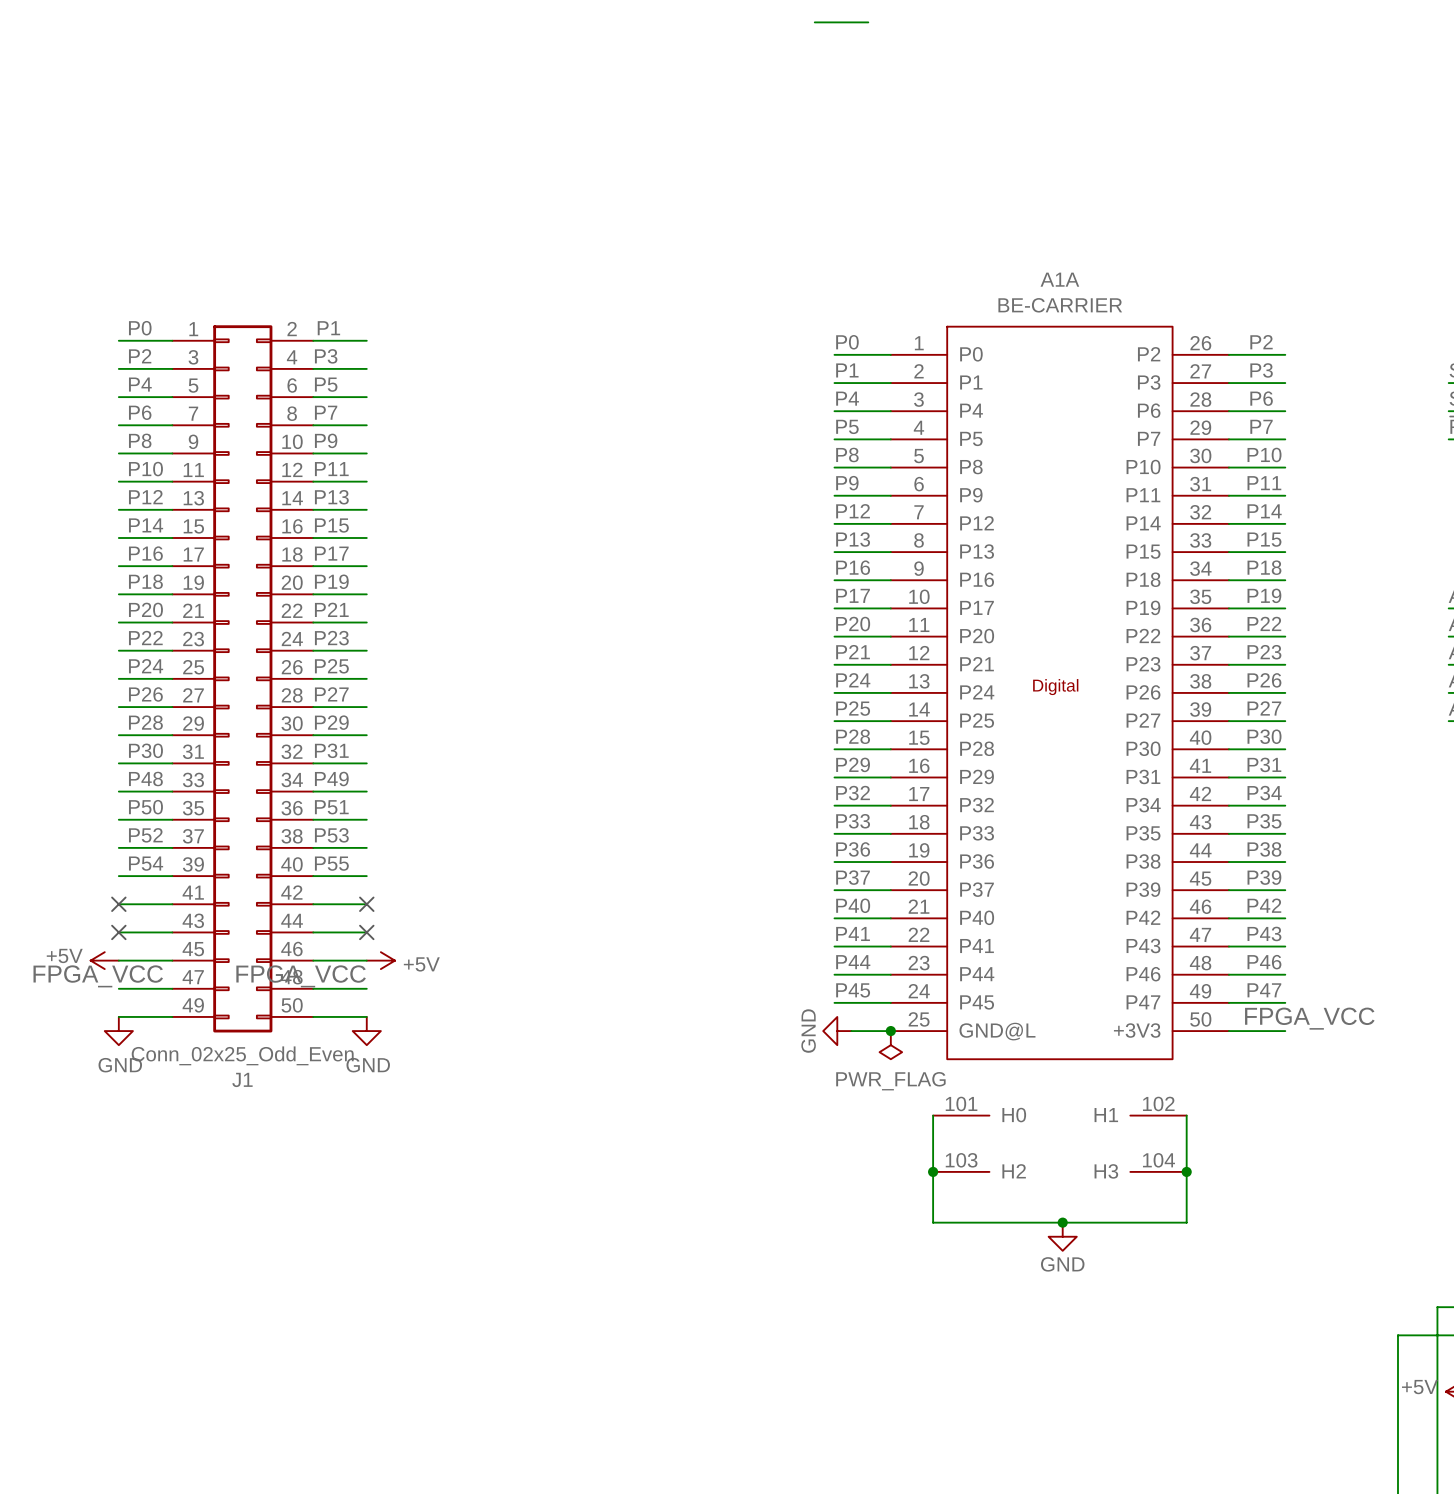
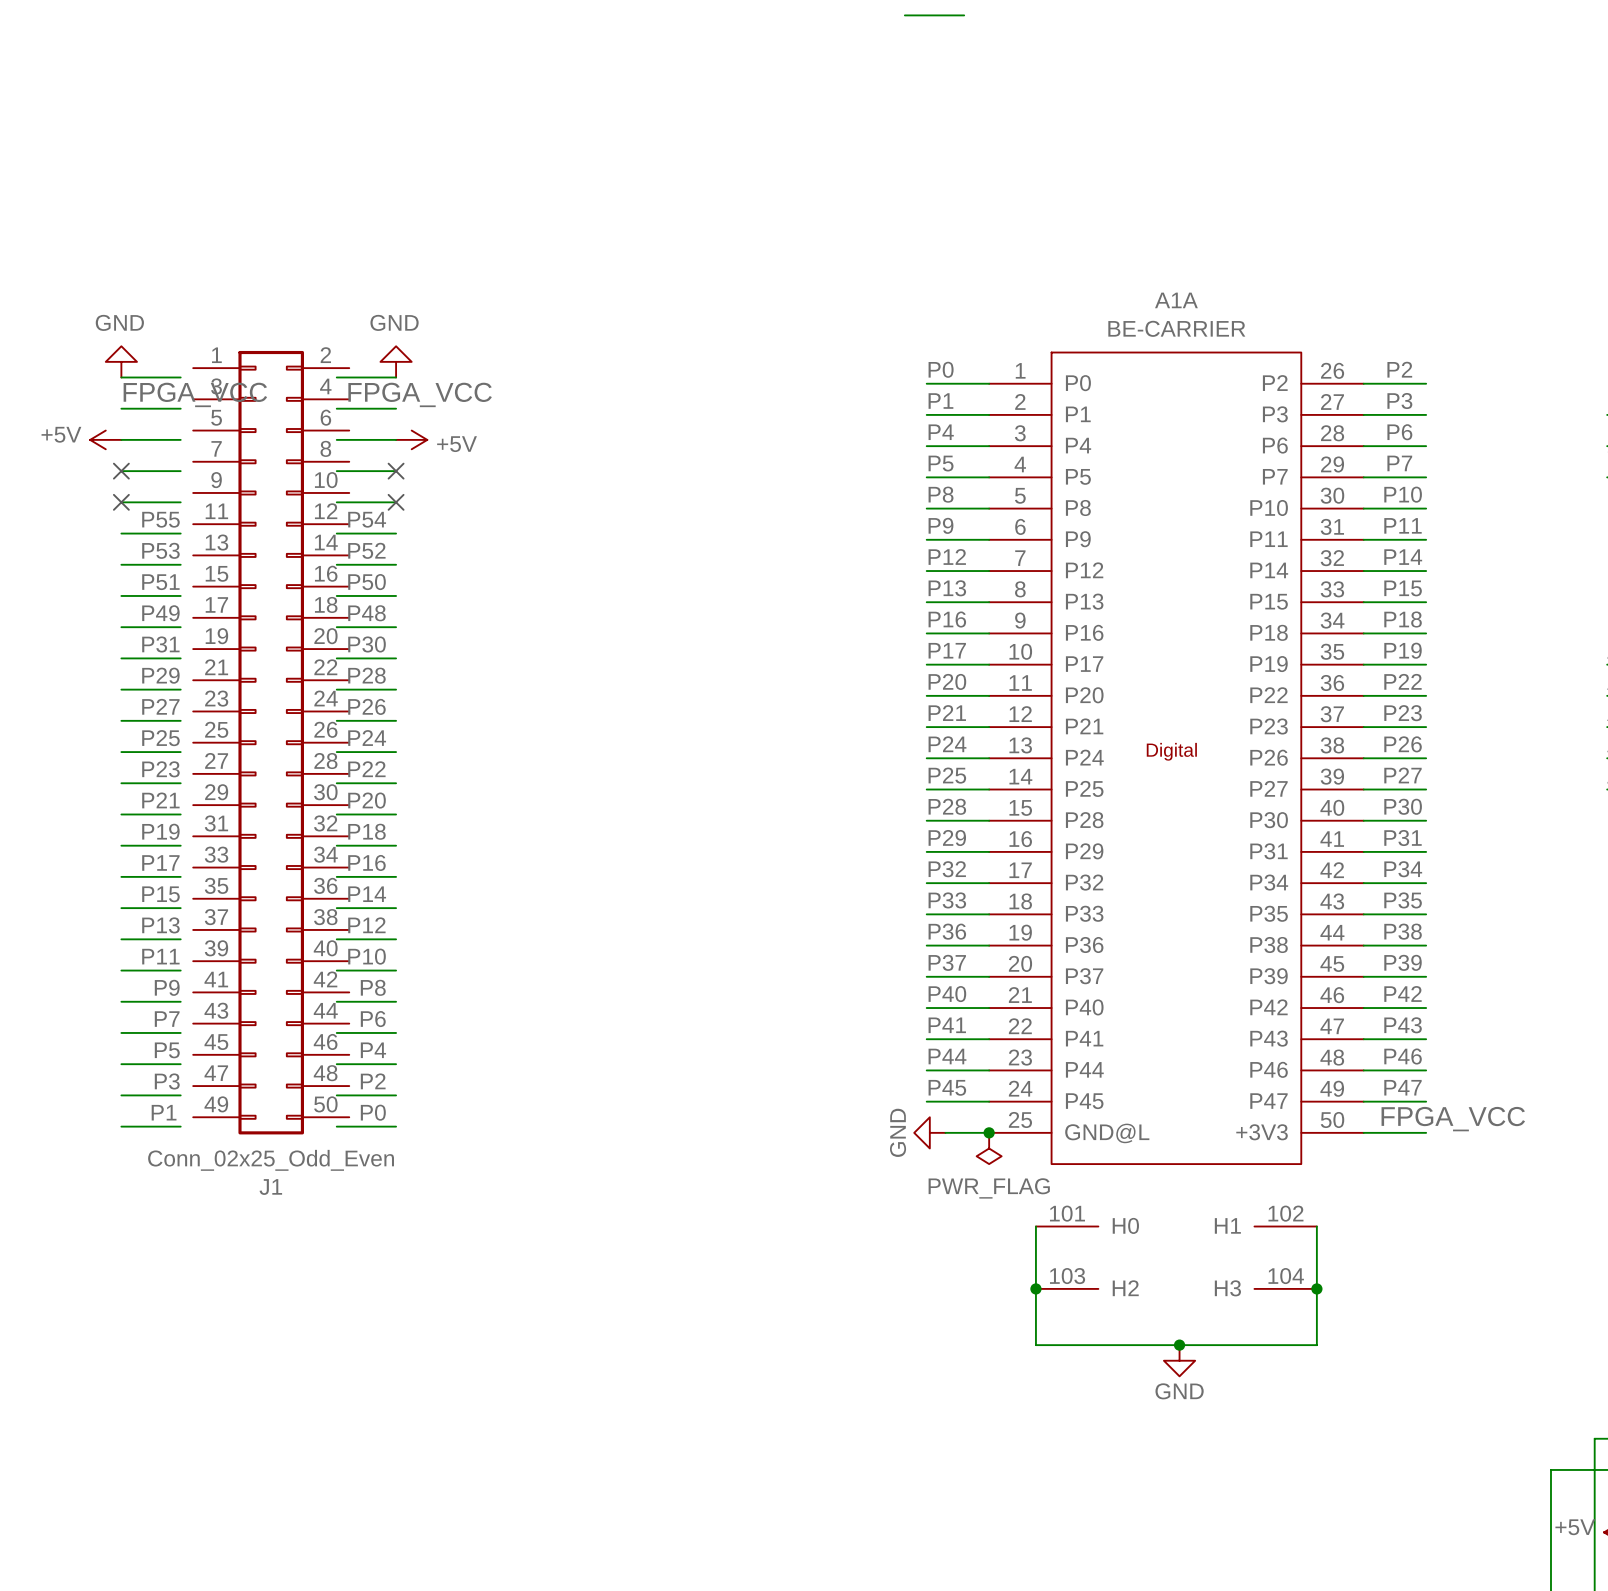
label: P0 (140, 328) -> none
label: P1 (328, 328) -> none
power symbol: none -> GND (121, 361)
power symbol: none -> GND (396, 361)
wire: (118, 340) (172, 340) -> (121, 377) (180, 377)
wire: (313, 340) (366, 340) -> (336, 377) (396, 377)
label: P2 (140, 356) -> none
label: P3 (326, 356) -> FPGA_VCC (420, 394)
label: none -> FPGA_VCC (195, 394)
wire: (118, 368) (172, 368) -> (121, 408) (180, 408)
wire: (313, 368) (366, 368) -> (336, 408) (396, 408)
label: P4 (140, 384) -> none
label: P5 (326, 384) -> none
wire: (118, 397) (172, 397) -> (121, 439) (180, 439)
wire: (313, 397) (366, 397) -> (336, 439) (396, 439)
power symbol: none -> +5V (105, 439)
power symbol: none -> +5V (411, 439)
label: P6 (140, 412) -> none
label: P7 (326, 412) -> none
wire: (118, 425) (172, 425) -> (121, 471) (180, 471)
wire: (313, 425) (366, 425) -> (336, 471) (396, 471)
no-connect mark: none -> (121, 471)
no-connect mark: none -> (396, 471)
label: P8 (140, 440) -> none
label: P9 (326, 440) -> none
wire: (118, 453) (172, 453) -> (121, 502) (180, 502)
wire: (313, 453) (366, 453) -> (336, 502) (396, 502)
no-connect mark: none -> (121, 502)
no-connect mark: none -> (396, 502)
label: P10 (145, 469) -> none
label: P11 (331, 469) -> none
label: none -> P55 (160, 519)
label: none -> P54 (367, 519)
wire: (118, 481) (172, 481) -> (121, 533) (180, 533)
wire: (313, 481) (366, 481) -> (336, 533) (396, 533)
label: P12 (145, 497) -> none
label: P13 (331, 497) -> none
label: none -> P53 (160, 550)
label: none -> P52 (366, 550)
wire: (118, 509) (172, 509) -> (121, 564) (180, 564)
wire: (313, 509) (366, 509) -> (336, 564) (396, 564)
label: P14 (146, 525) -> none
label: P15 (331, 525) -> none
label: none -> P51 (160, 582)
label: none -> P50 (367, 582)
wire: (118, 537) (172, 537) -> (121, 595) (180, 595)
wire: (313, 537) (366, 537) -> (336, 595) (396, 595)
label: P16 (145, 553) -> none
label: P17 (331, 553) -> none
label: none -> P48 (366, 613)
wire: (118, 566) (172, 566) -> (121, 627) (180, 627)
wire: (313, 566) (366, 566) -> (336, 627) (396, 627)
label: P18 (145, 581) -> none
label position: P19 (331, 581) -> P19 (160, 831)
wire: (118, 594) (172, 594) -> (121, 658) (180, 658)
wire: (313, 594) (366, 594) -> (336, 658) (396, 658)
label position: P20 (145, 609) -> P20 (367, 800)
label position: P21 (331, 609) -> P21 (160, 800)
wire: (118, 622) (172, 622) -> (121, 689) (180, 689)
wire: (313, 622) (366, 622) -> (336, 689) (396, 689)
label position: P22 (145, 638) -> P22 (366, 769)
label position: P23 (331, 638) -> P23 (160, 769)
wire: (118, 650) (172, 650) -> (121, 720) (180, 720)
wire: (313, 650) (366, 650) -> (336, 720) (396, 720)
label position: P24 (146, 666) -> P24 (367, 738)
label position: P25 (331, 666) -> P25 (160, 738)
wire: (118, 678) (172, 678) -> (121, 752) (180, 752)
wire: (313, 678) (366, 678) -> (336, 752) (396, 752)
label position: P26 (145, 694) -> P26 (366, 706)
label position: P27 (331, 694) -> P27 (160, 706)
wire: (118, 707) (172, 707) -> (121, 783) (180, 783)
wire: (313, 707) (366, 707) -> (336, 783) (396, 783)
label position: P28 (145, 722) -> P28 (366, 675)
label position: P29 (331, 722) -> P29 (160, 675)
wire: (118, 735) (172, 735) -> (121, 814) (180, 814)
wire: (313, 735) (366, 735) -> (336, 814) (396, 814)
label position: P30 (145, 750) -> P30 (367, 644)
label position: P31 (331, 750) -> P31 (160, 644)
label: none -> P18 (366, 831)
wire: (118, 763) (172, 763) -> (121, 845) (180, 845)
wire: (313, 763) (366, 763) -> (336, 845) (396, 845)
label: P48 (145, 778) -> none
label position: P49 (331, 778) -> P49 (160, 613)
label: none -> P17 (160, 862)
label: none -> P16 (366, 862)
wire: (118, 791) (172, 791) -> (121, 876) (180, 876)
wire: (313, 791) (366, 791) -> (336, 876) (396, 876)
label: P50 (145, 807) -> none
label: P51 (331, 807) -> none
label: none -> P15 (160, 894)
label: none -> P14 (367, 894)
wire: (118, 819) (172, 819) -> (121, 908) (180, 908)
wire: (313, 819) (366, 819) -> (336, 908) (396, 908)
label: P52 (145, 835) -> none
label: P53 (331, 835) -> none
label: none -> P13 (160, 925)
label: none -> P12 (366, 925)
wire: (118, 847) (172, 847) -> (121, 939) (180, 939)
wire: (313, 847) (366, 847) -> (336, 939) (396, 939)
label: P54 (146, 863) -> none
label: P55 (331, 863) -> none
label: none -> P11 (160, 956)
label: none -> P10 (367, 956)
wire: (118, 876) (172, 876) -> (121, 970) (180, 970)
wire: (313, 876) (366, 876) -> (336, 970) (396, 970)
label: none -> P9 (167, 987)
label: none -> P8 (373, 987)
wire: (118, 904) (172, 904) -> (121, 1001) (180, 1001)
no-connect mark: (118, 904) -> none
wire: (313, 904) (366, 904) -> (336, 1001) (396, 1001)
no-connect mark: (366, 904) -> none
label: none -> P7 (167, 1019)
label: none -> P6 (373, 1019)
wire: (118, 932) (172, 932) -> (121, 1032) (180, 1032)
no-connect mark: (118, 932) -> none
wire: (313, 932) (366, 932) -> (336, 1032) (396, 1032)
no-connect mark: (366, 932) -> none
label: none -> P5 (167, 1050)
label: none -> P4 (373, 1050)
power symbol: +5V (104, 960) -> none
wire: (118, 960) (172, 960) -> (121, 1064) (180, 1064)
wire: (313, 960) (366, 960) -> (336, 1064) (396, 1064)
power symbol: +5V (380, 960) -> none
label: FPGA_VCC (98, 976) -> P3 (167, 1081)
label: FPGA_VCC (301, 976) -> none
label: none -> P2 (373, 1081)
wire: (118, 988) (172, 988) -> (121, 1095) (180, 1095)
wire: (313, 988) (366, 988) -> (336, 1095) (396, 1095)
label: none -> P1 (164, 1112)
label: none -> P0 (373, 1112)
wire: (118, 1016) (172, 1016) -> (121, 1126) (180, 1126)
wire: (313, 1016) (366, 1016) -> (336, 1126) (396, 1126)
power symbol: GND (118, 1031) -> none
power symbol: GND (366, 1031) -> none

